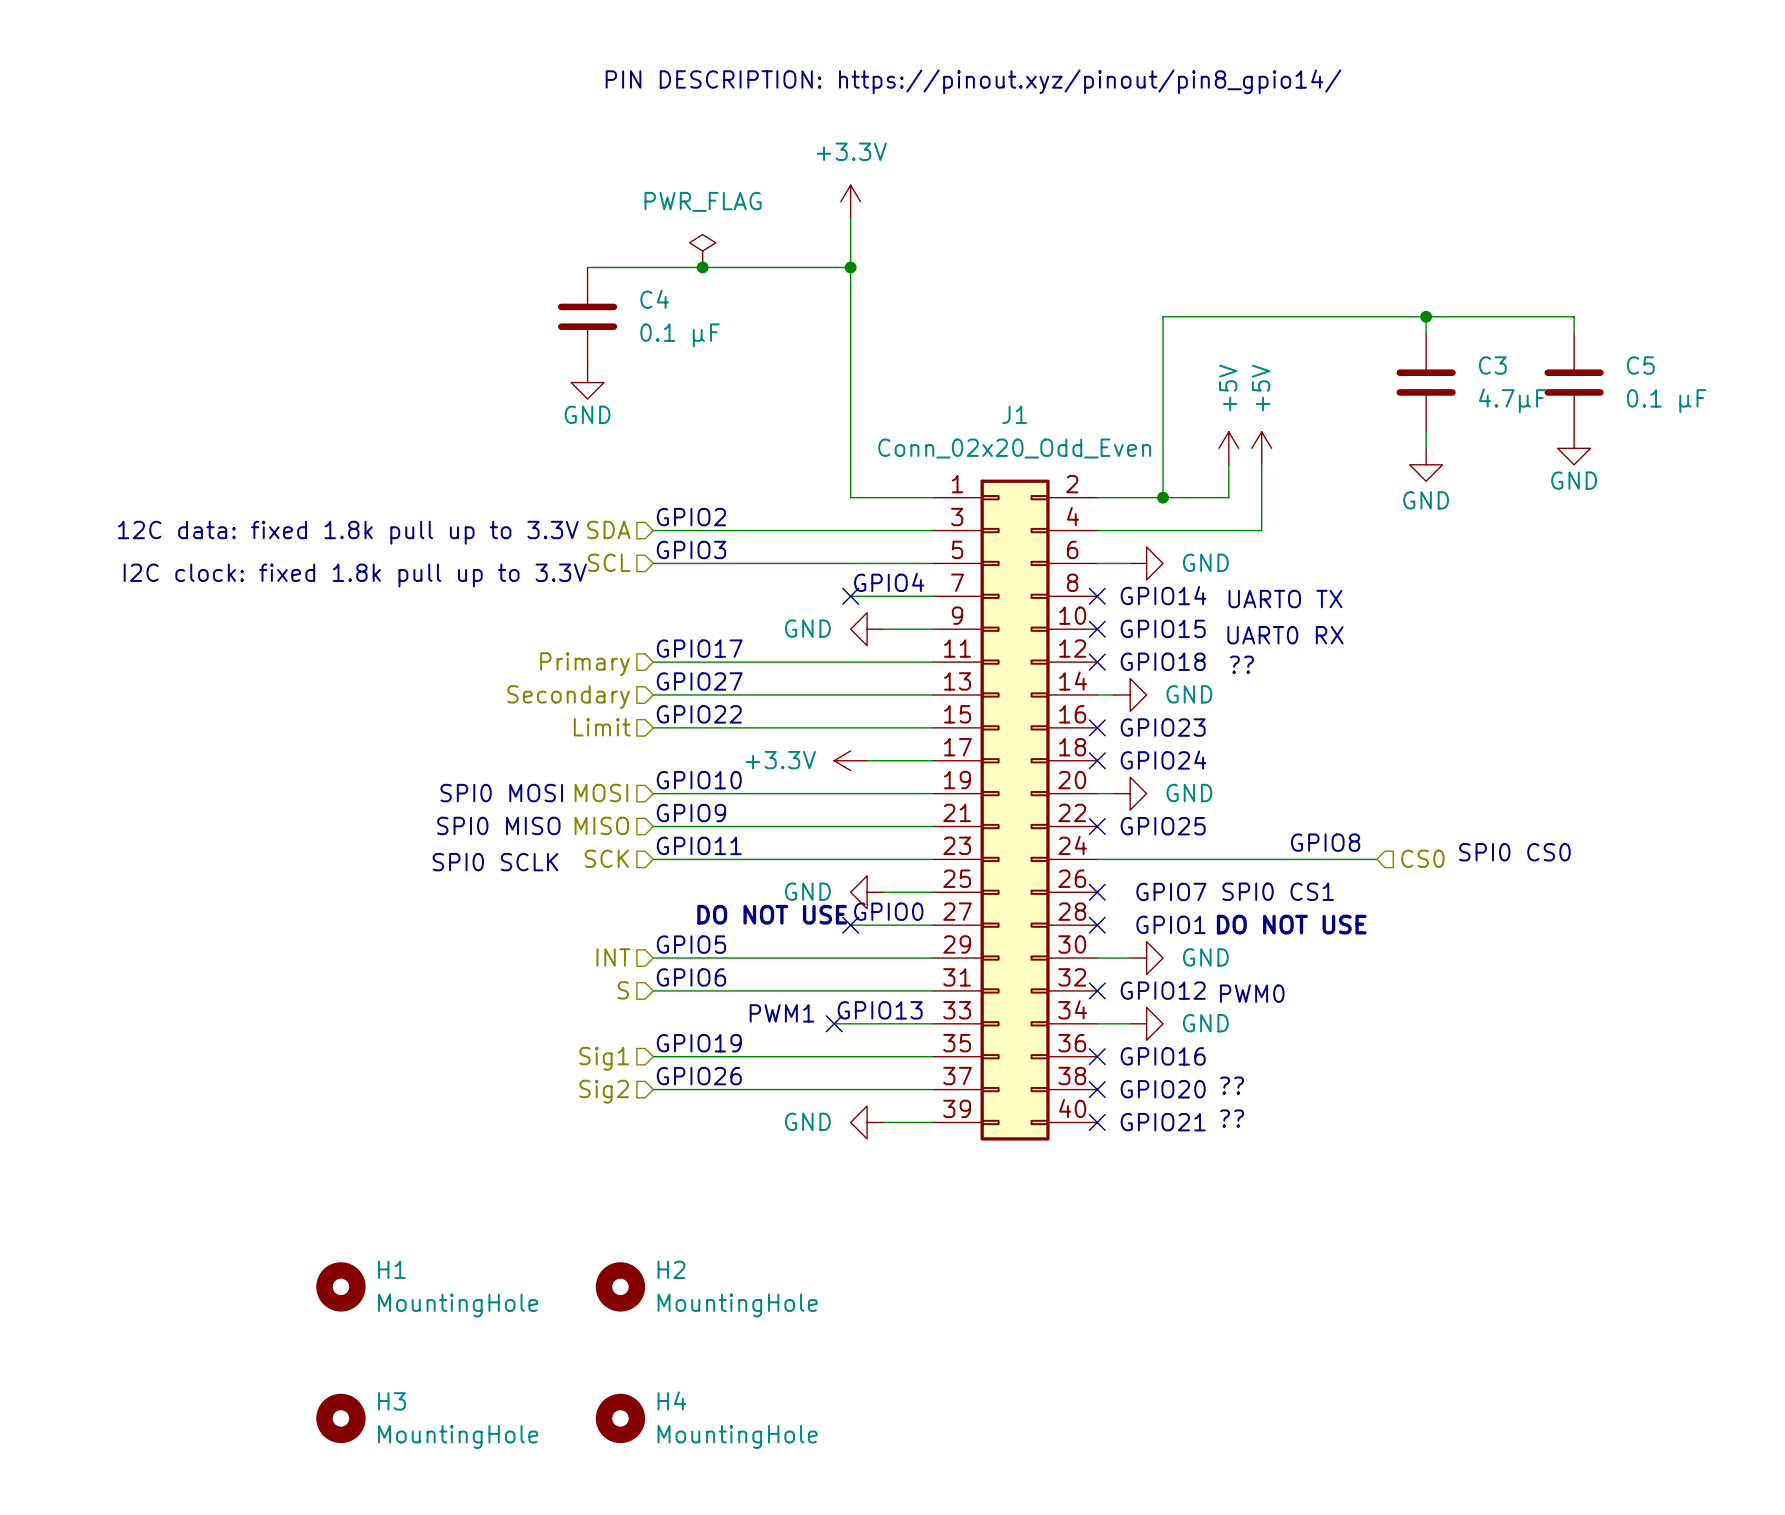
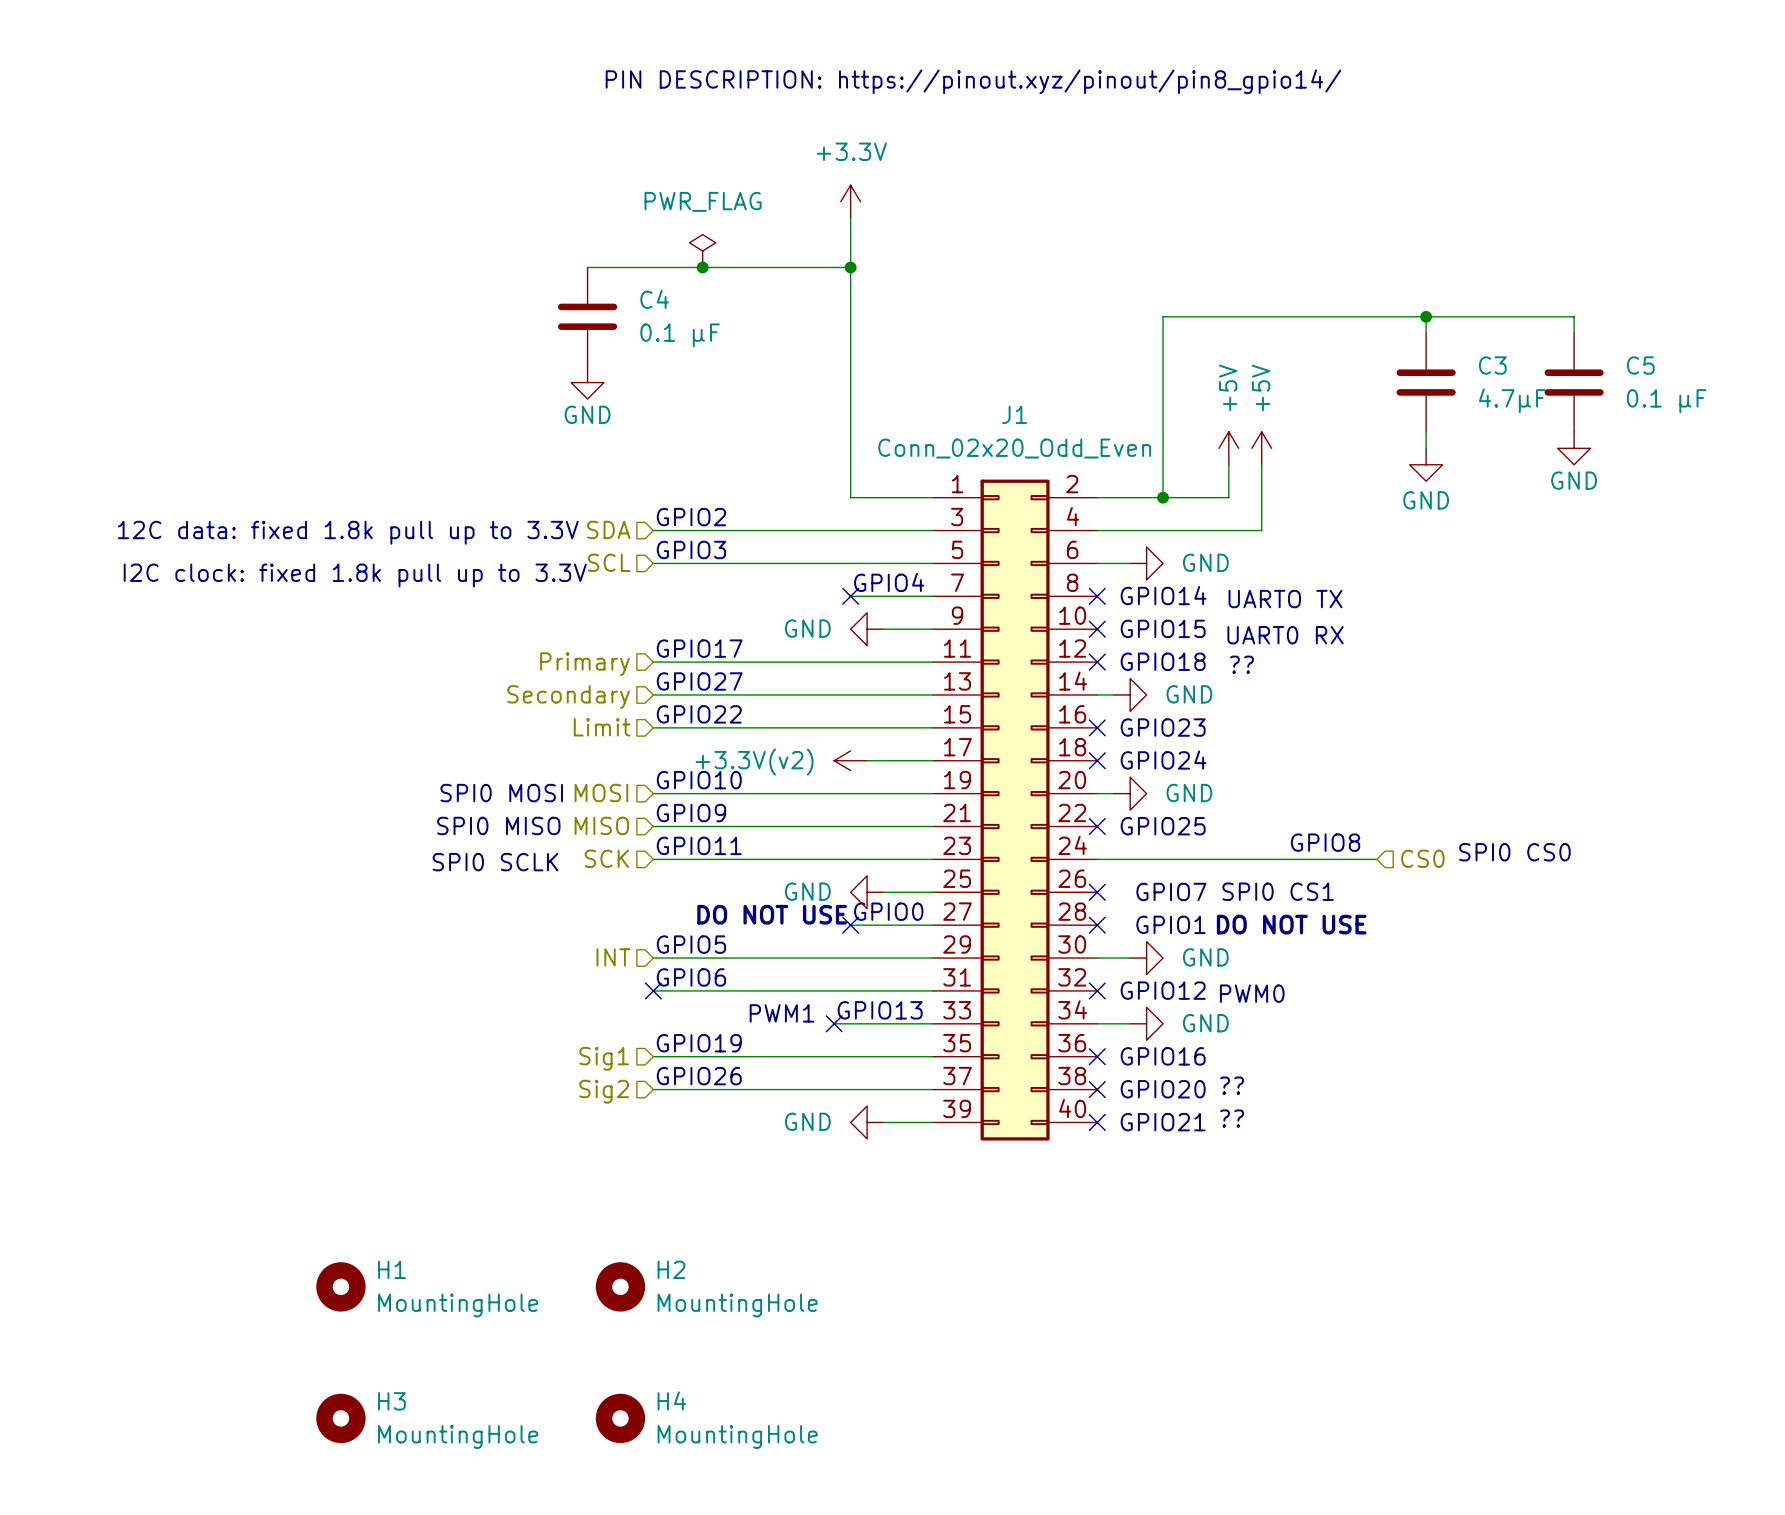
power symbol: +3.3V (850, 760) -> +3.3V(v2) (850, 760)
hierarchical label: S (623, 990) -> none
no-connect mark: none -> (653, 990)

